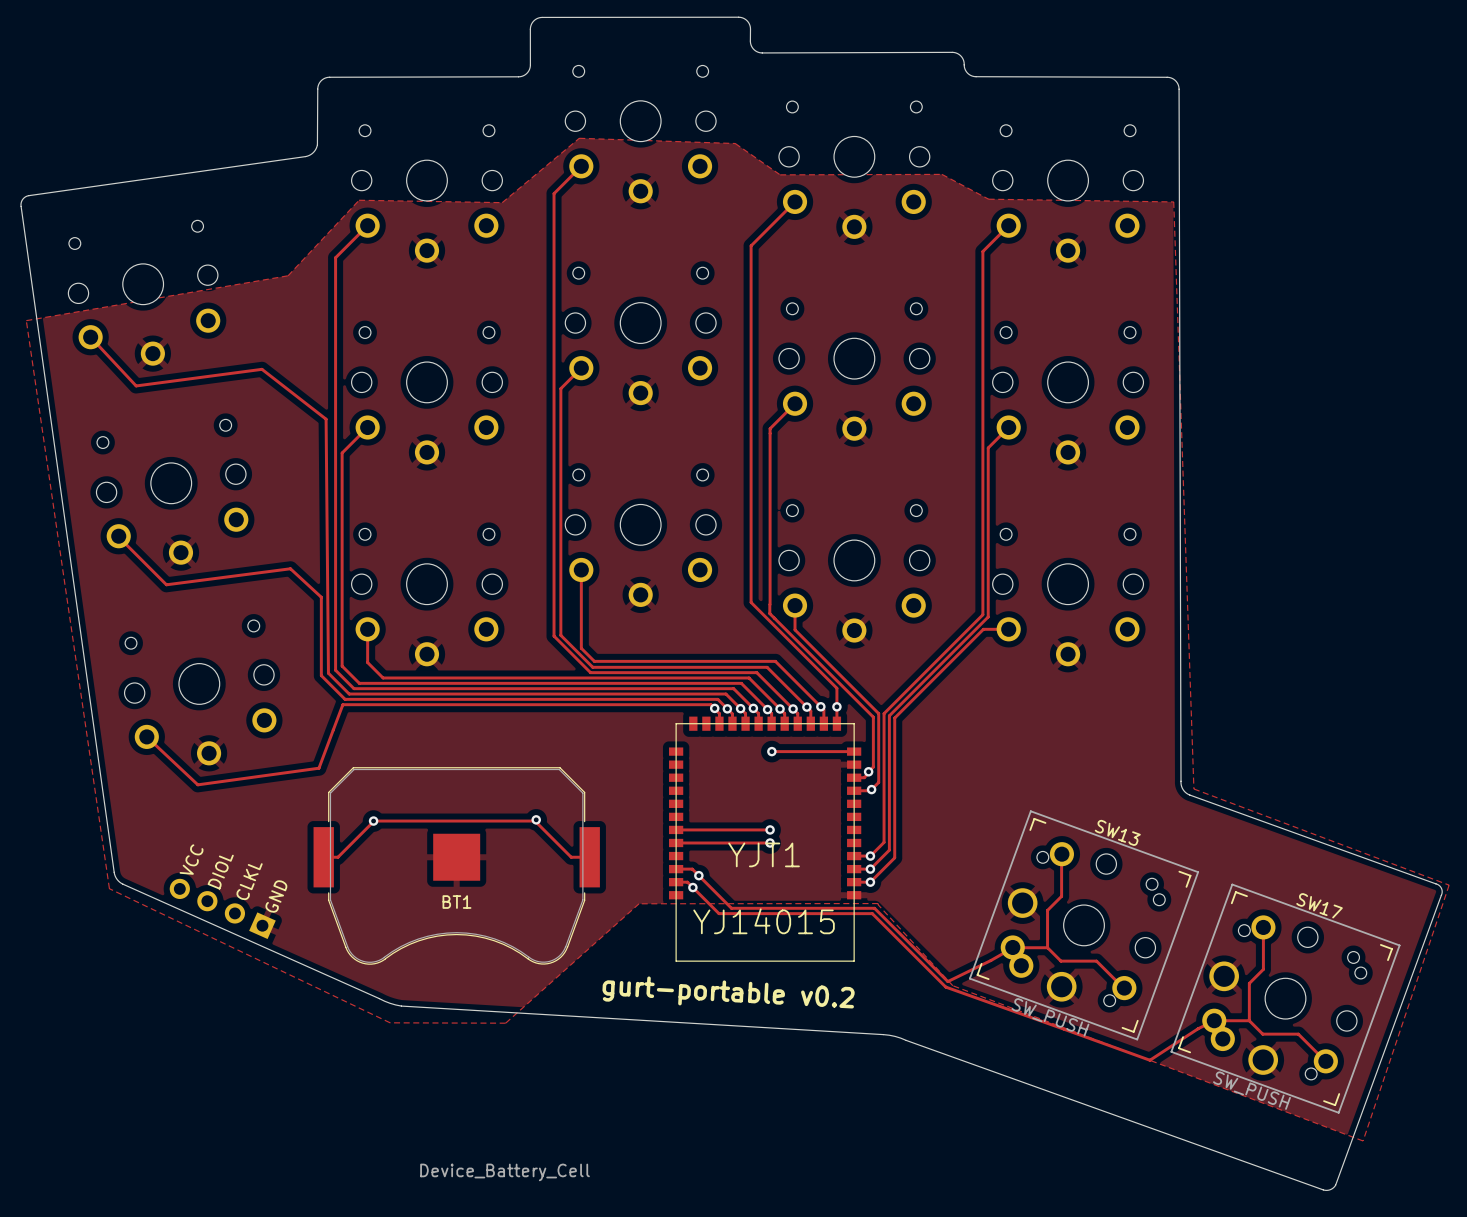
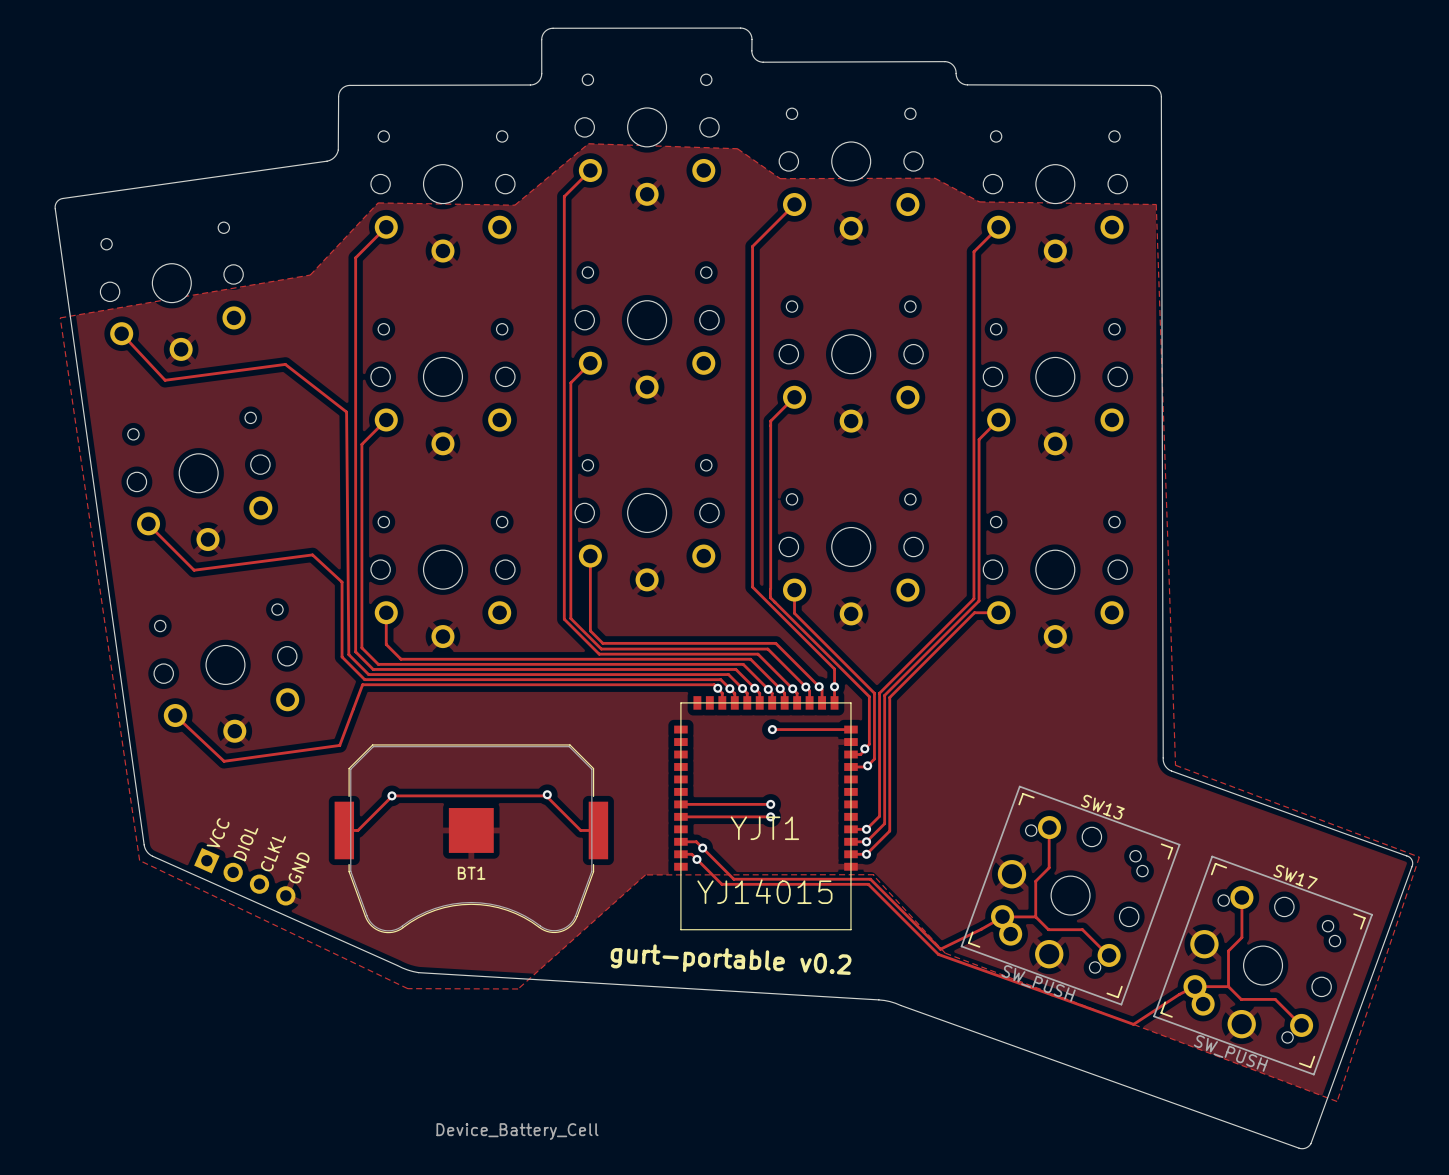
part rotation: 0° (222, 908) -> 180° (244, 876)

